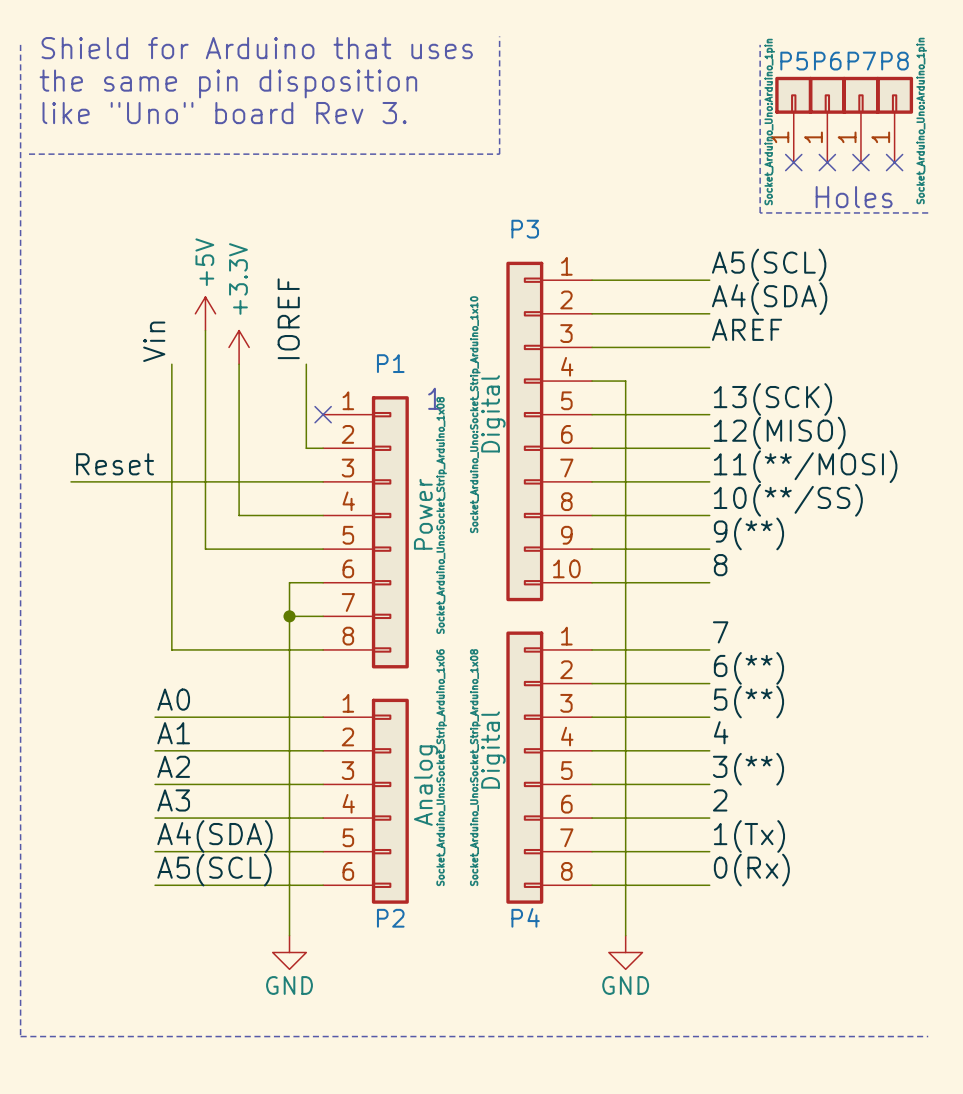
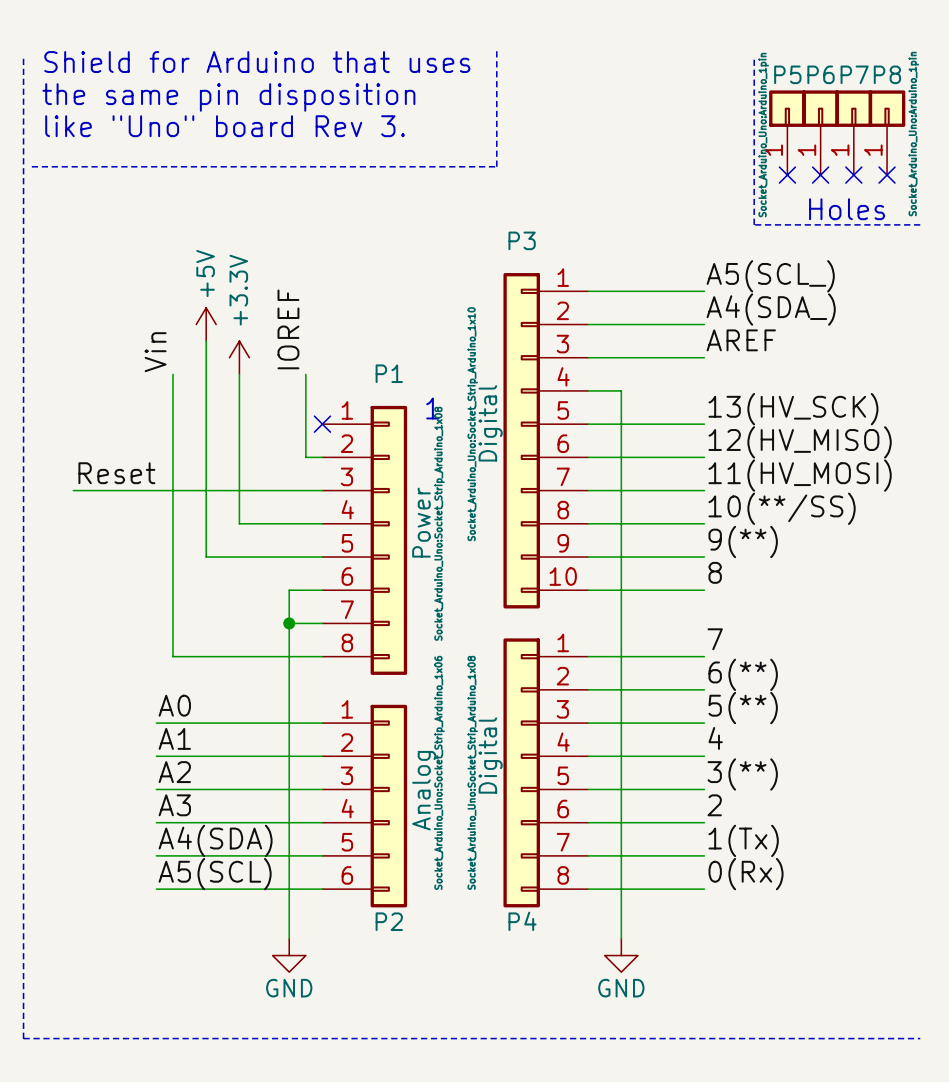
label: A5(SCL) (769, 265) -> A5(SCL_) (770, 276)
label: A4(SDA) (769, 298) -> A4(SDA_) (771, 309)
label: 13(SCK) (772, 399) -> 13(HV_SCK) (793, 409)
label: 12(MISO) (779, 433) -> 12(HV_MISO) (800, 442)
label: 11(**/MOSI) (805, 466) -> 11(HV_MOSI) (800, 475)

